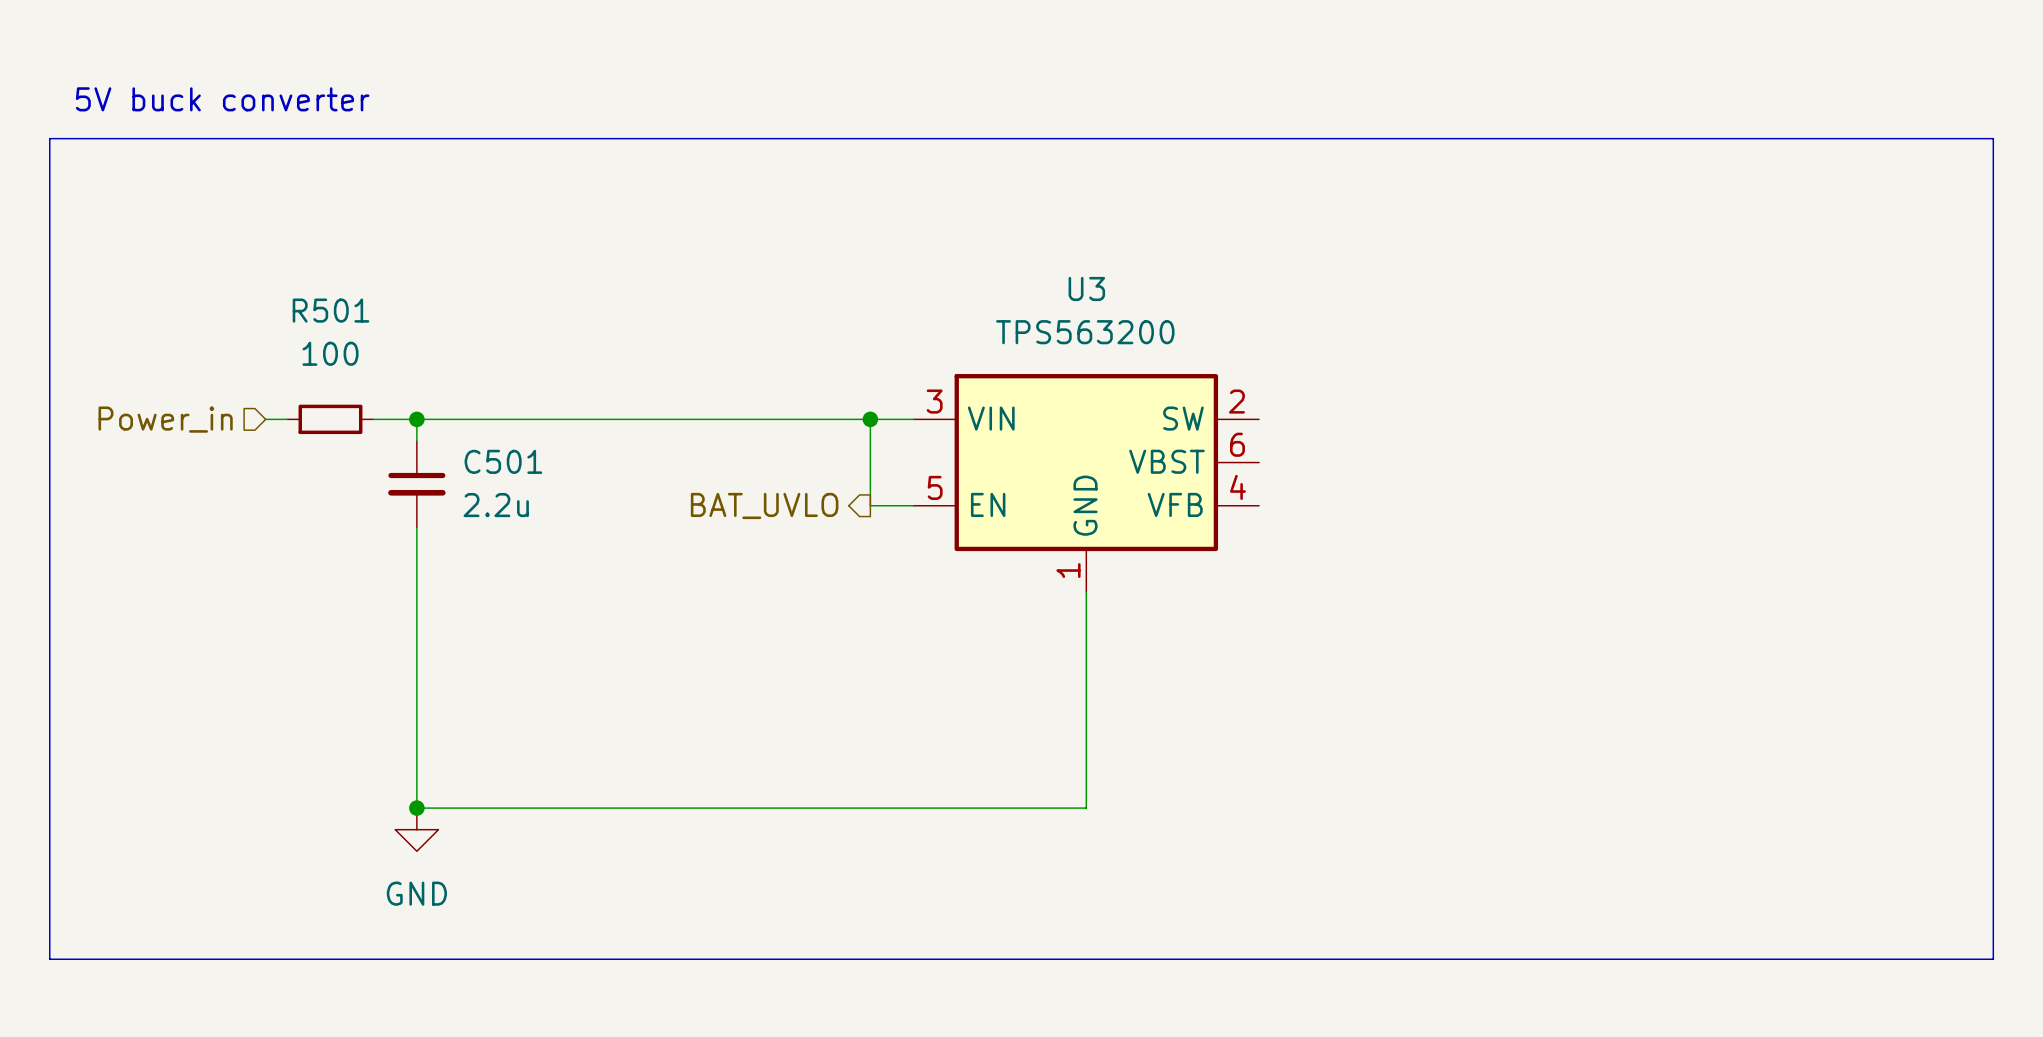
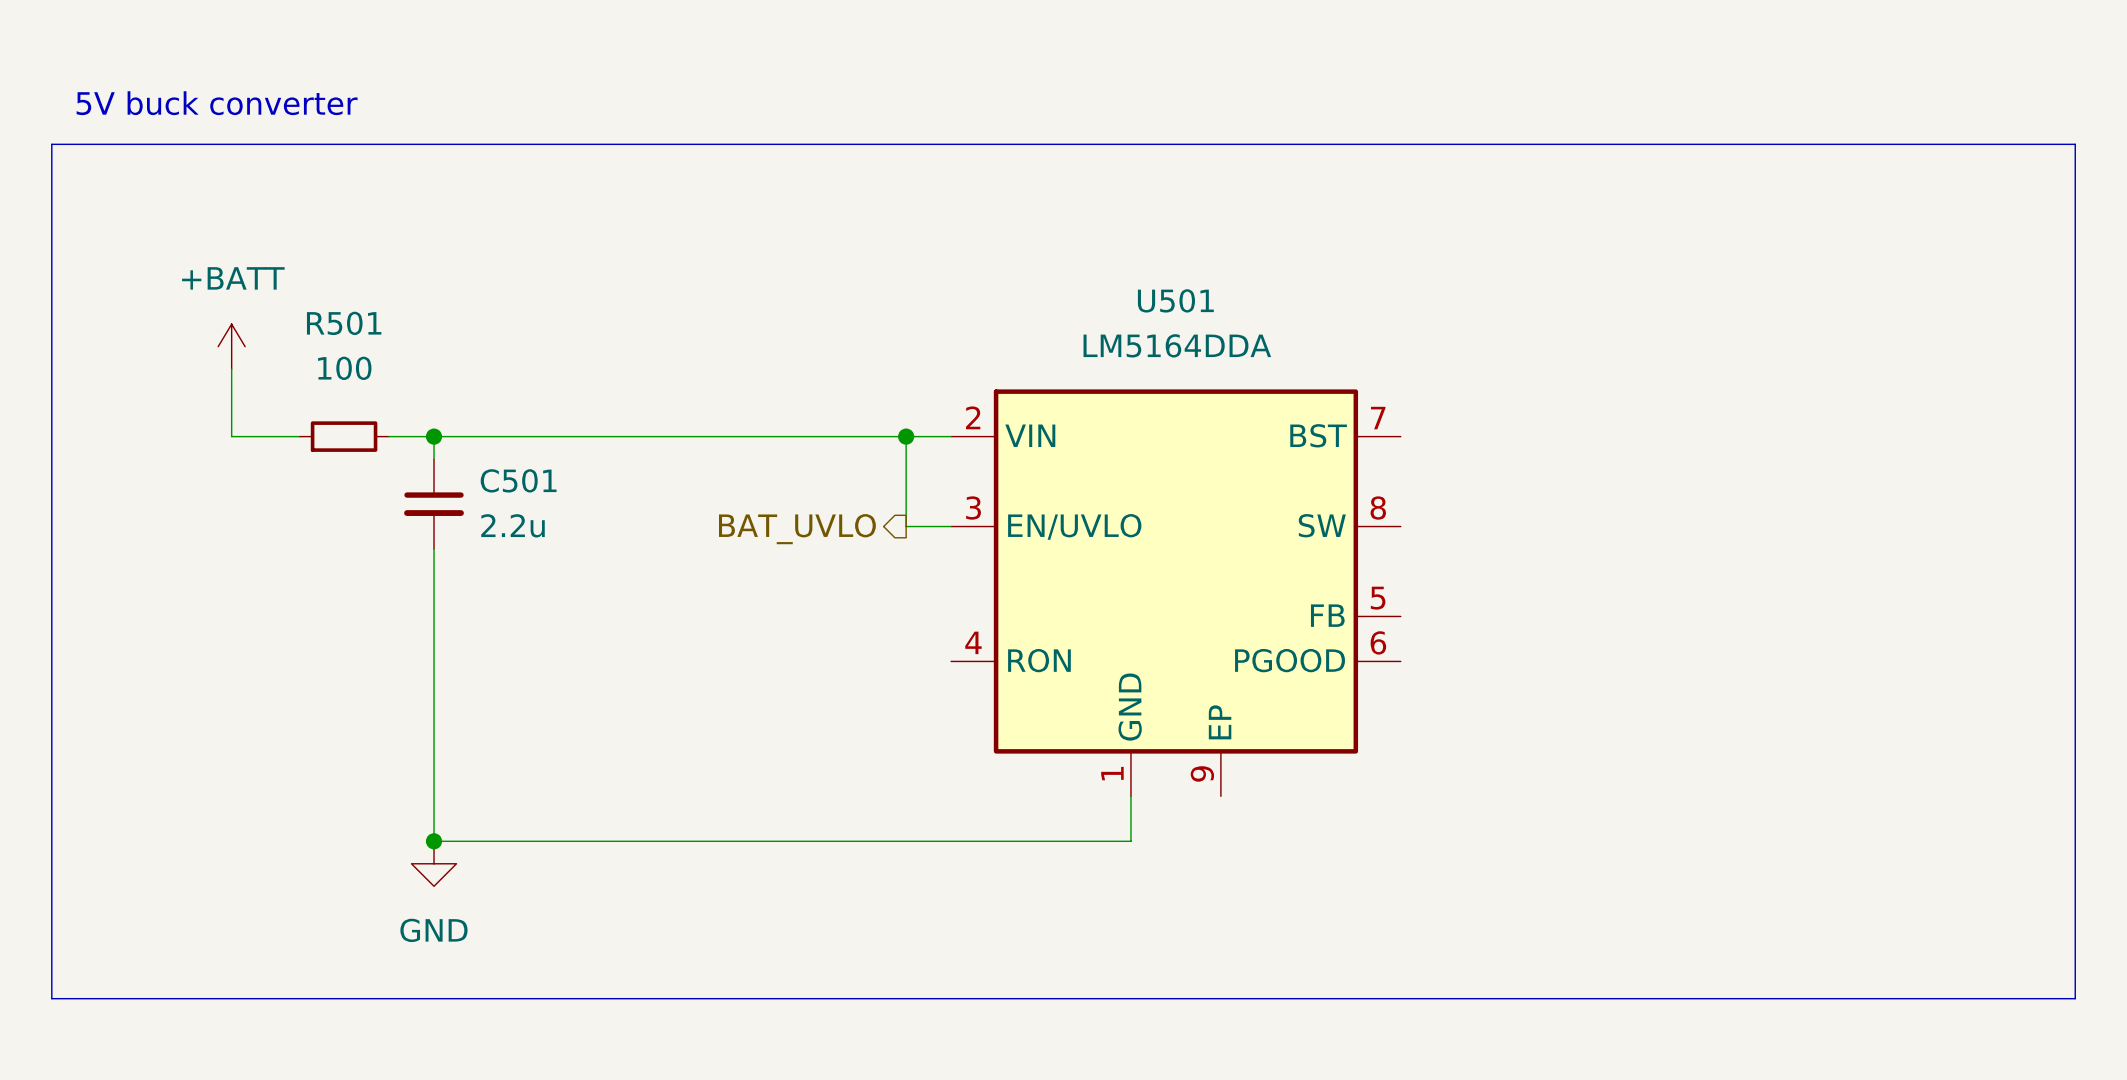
power symbol: none -> +BATT (231, 346)
wire: none -> (231, 369) (231, 436) (276, 436)
hierarchical label: Power_in (165, 419) -> none
U3: TPS563200 (1086, 483) -> none
U501: none -> LM5164DDA (1175, 592)

